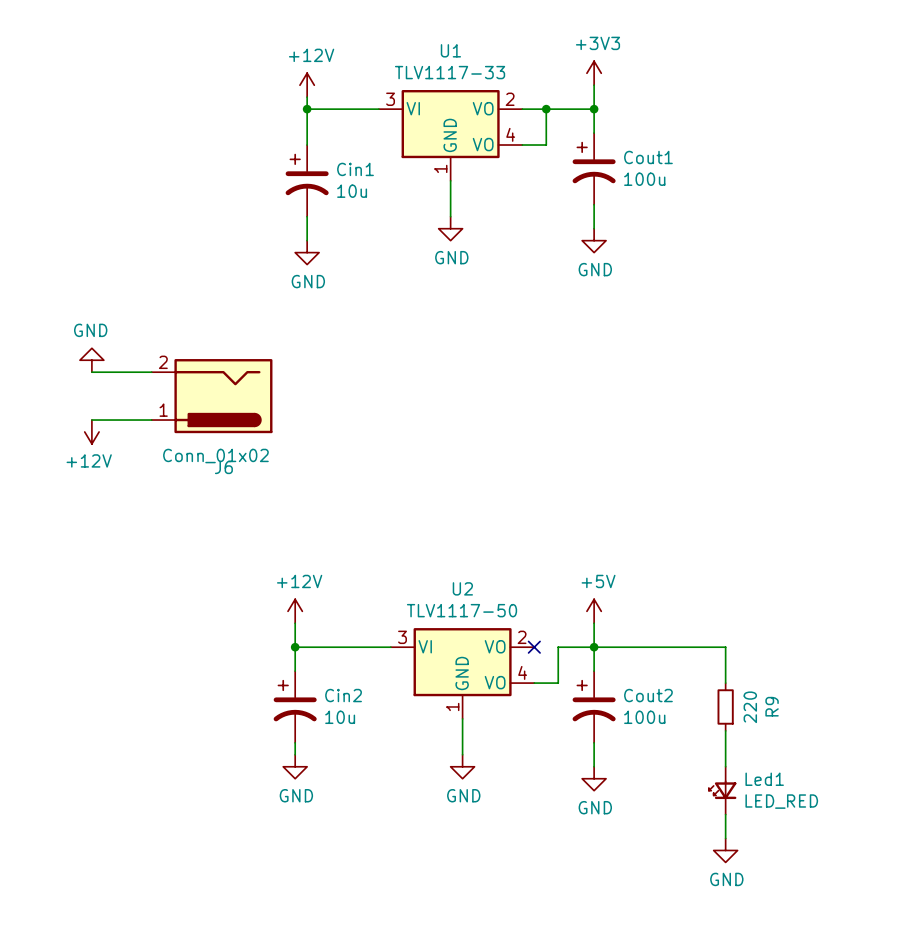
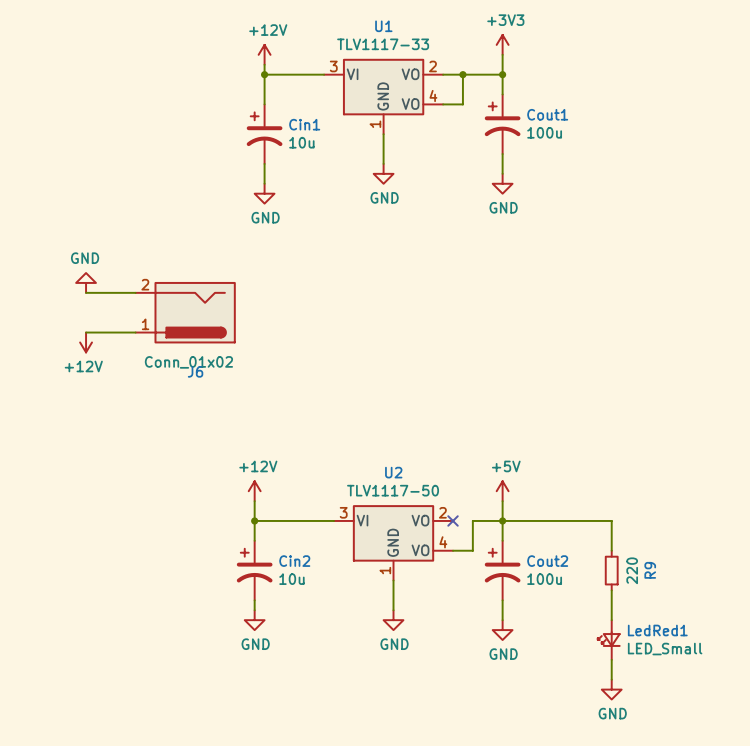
Led1 name: Led1 (764, 779) -> LedRed1 (657, 630)
Led1 value: LED_RED (781, 801) -> LED_Small (665, 649)

